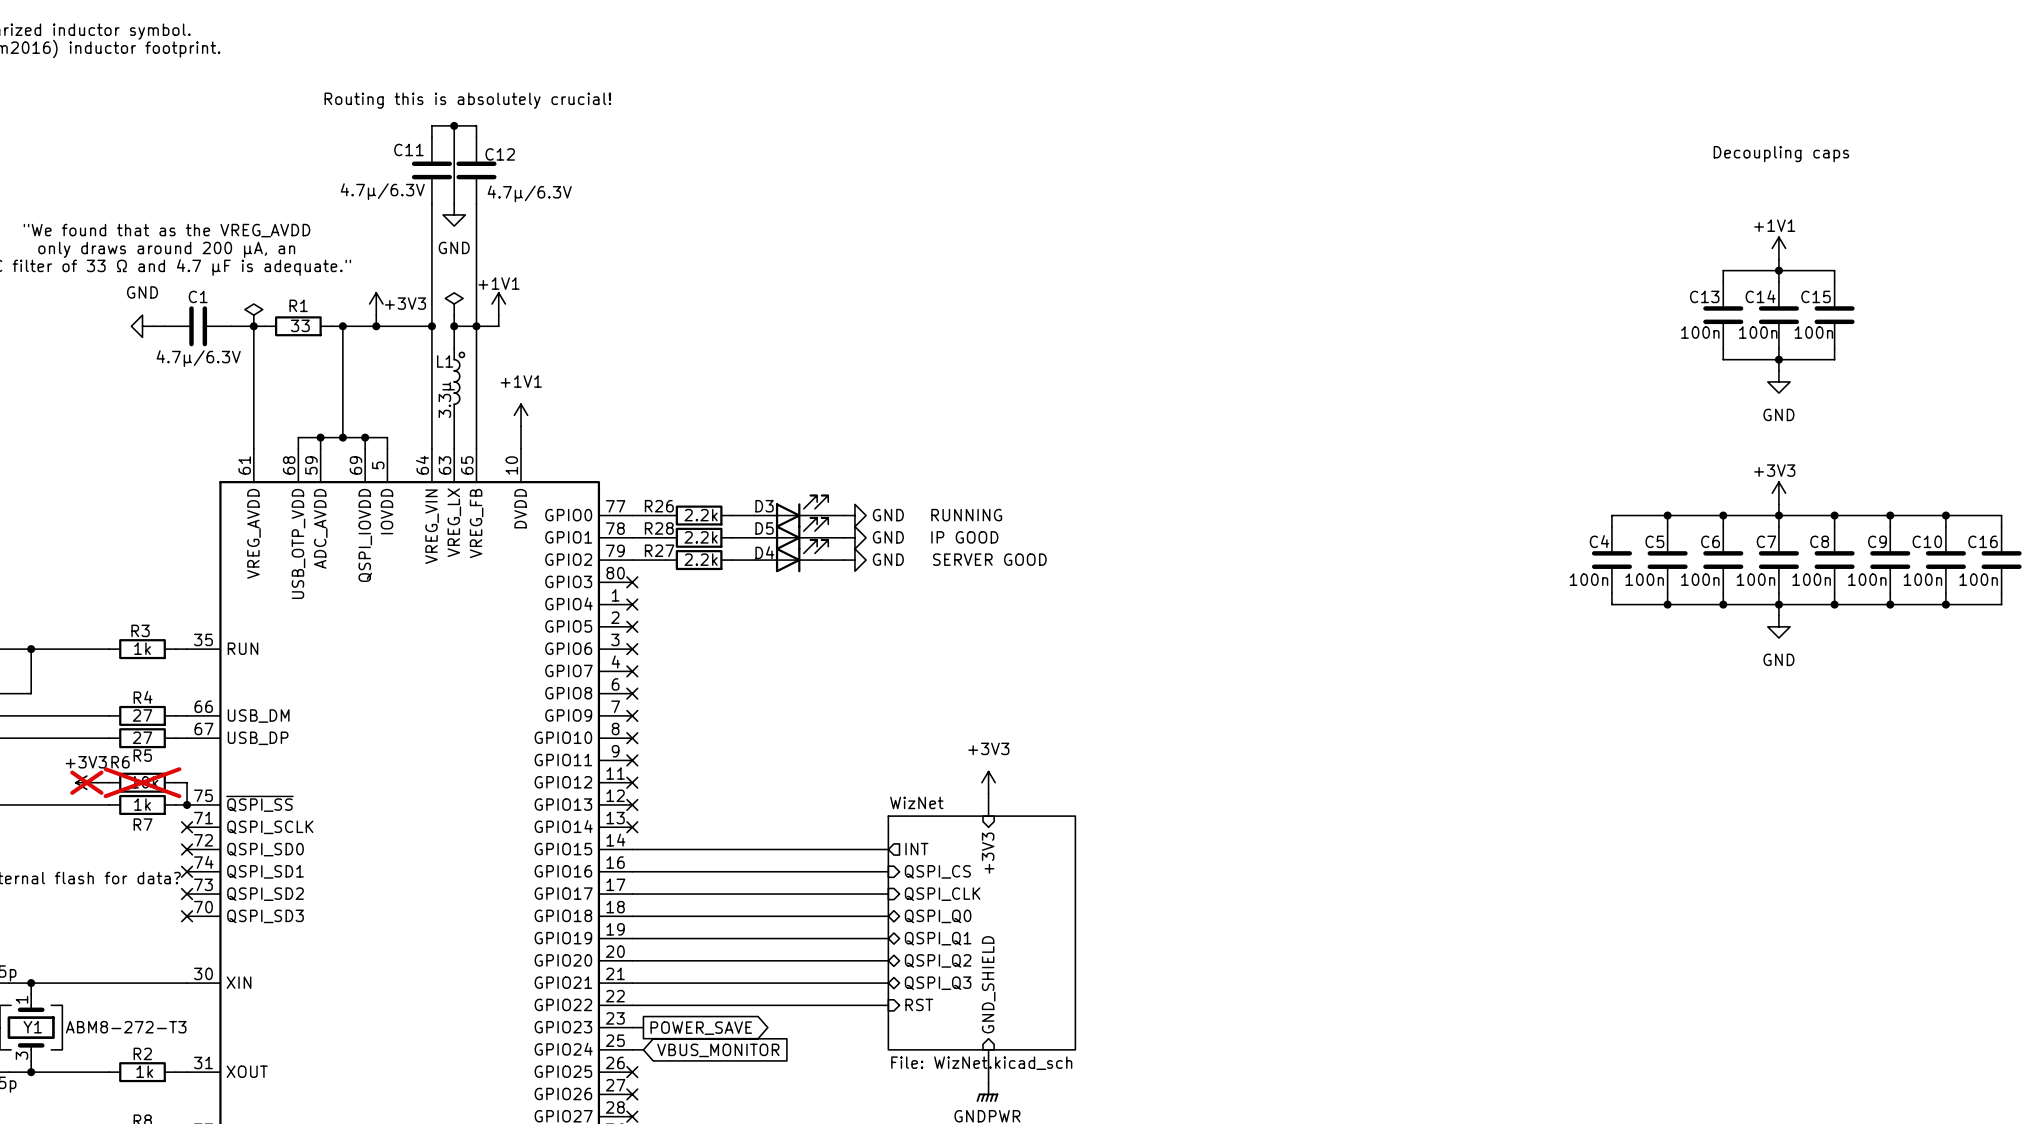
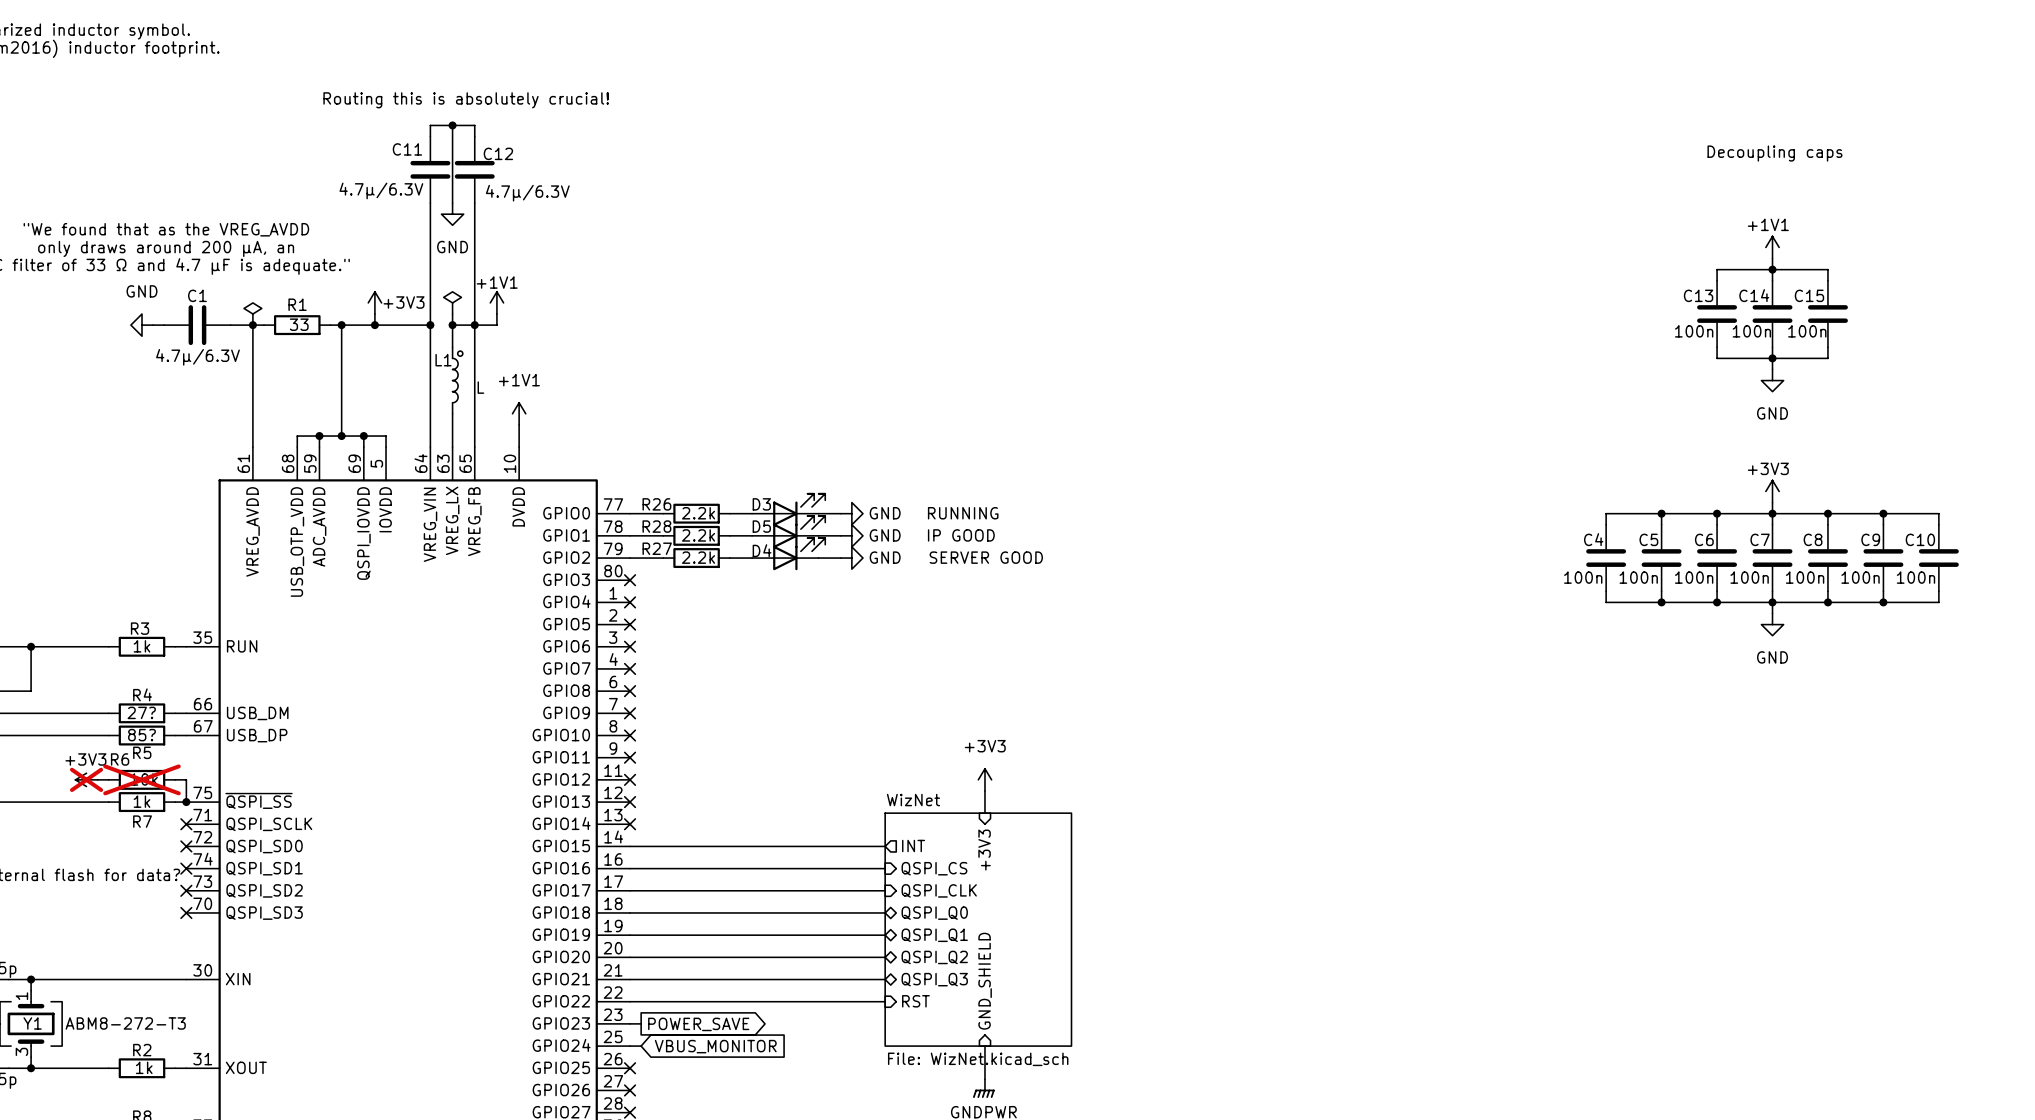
L1 value: 3.3µ (446, 400) -> L (480, 387)
wire: (1945, 515) (2001, 515) (2001, 526) -> none
junction: (1945, 515) -> none
C16: 100n (2001, 560) -> none
wire: (2001, 593) (2001, 604) (1945, 604) -> none
junction: (1945, 604) -> none
R4 value: 27 (142, 715) -> 27? (141, 712)
R5 value: 27 (142, 737) -> 85? (141, 735)

